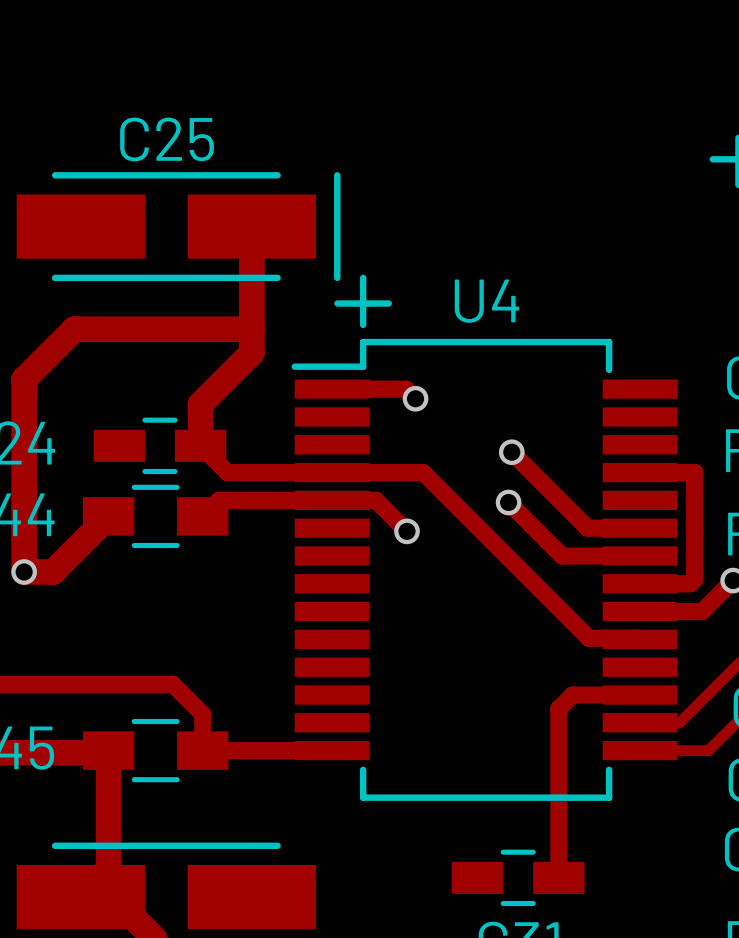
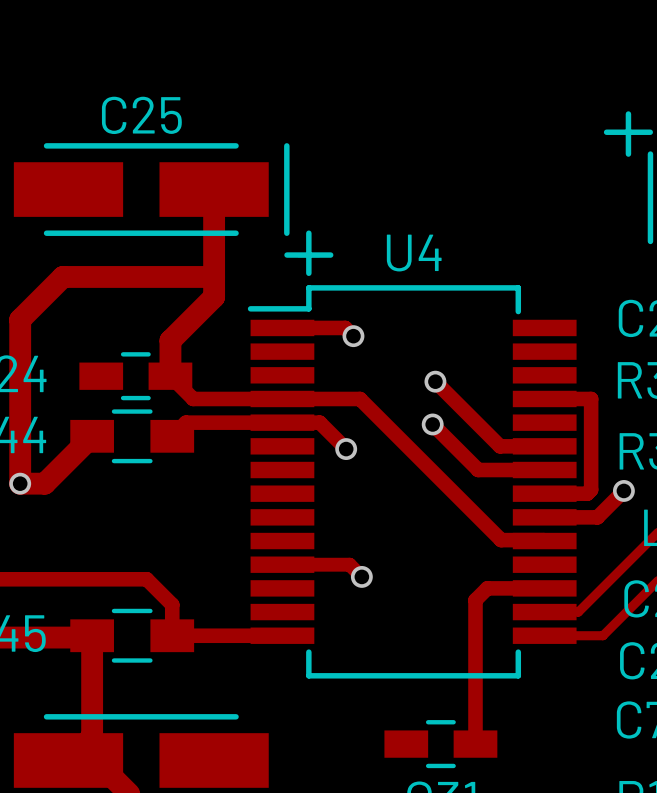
track: none -> (282, 564) (349, 564) (361, 576)
via: none -> (361, 576)

